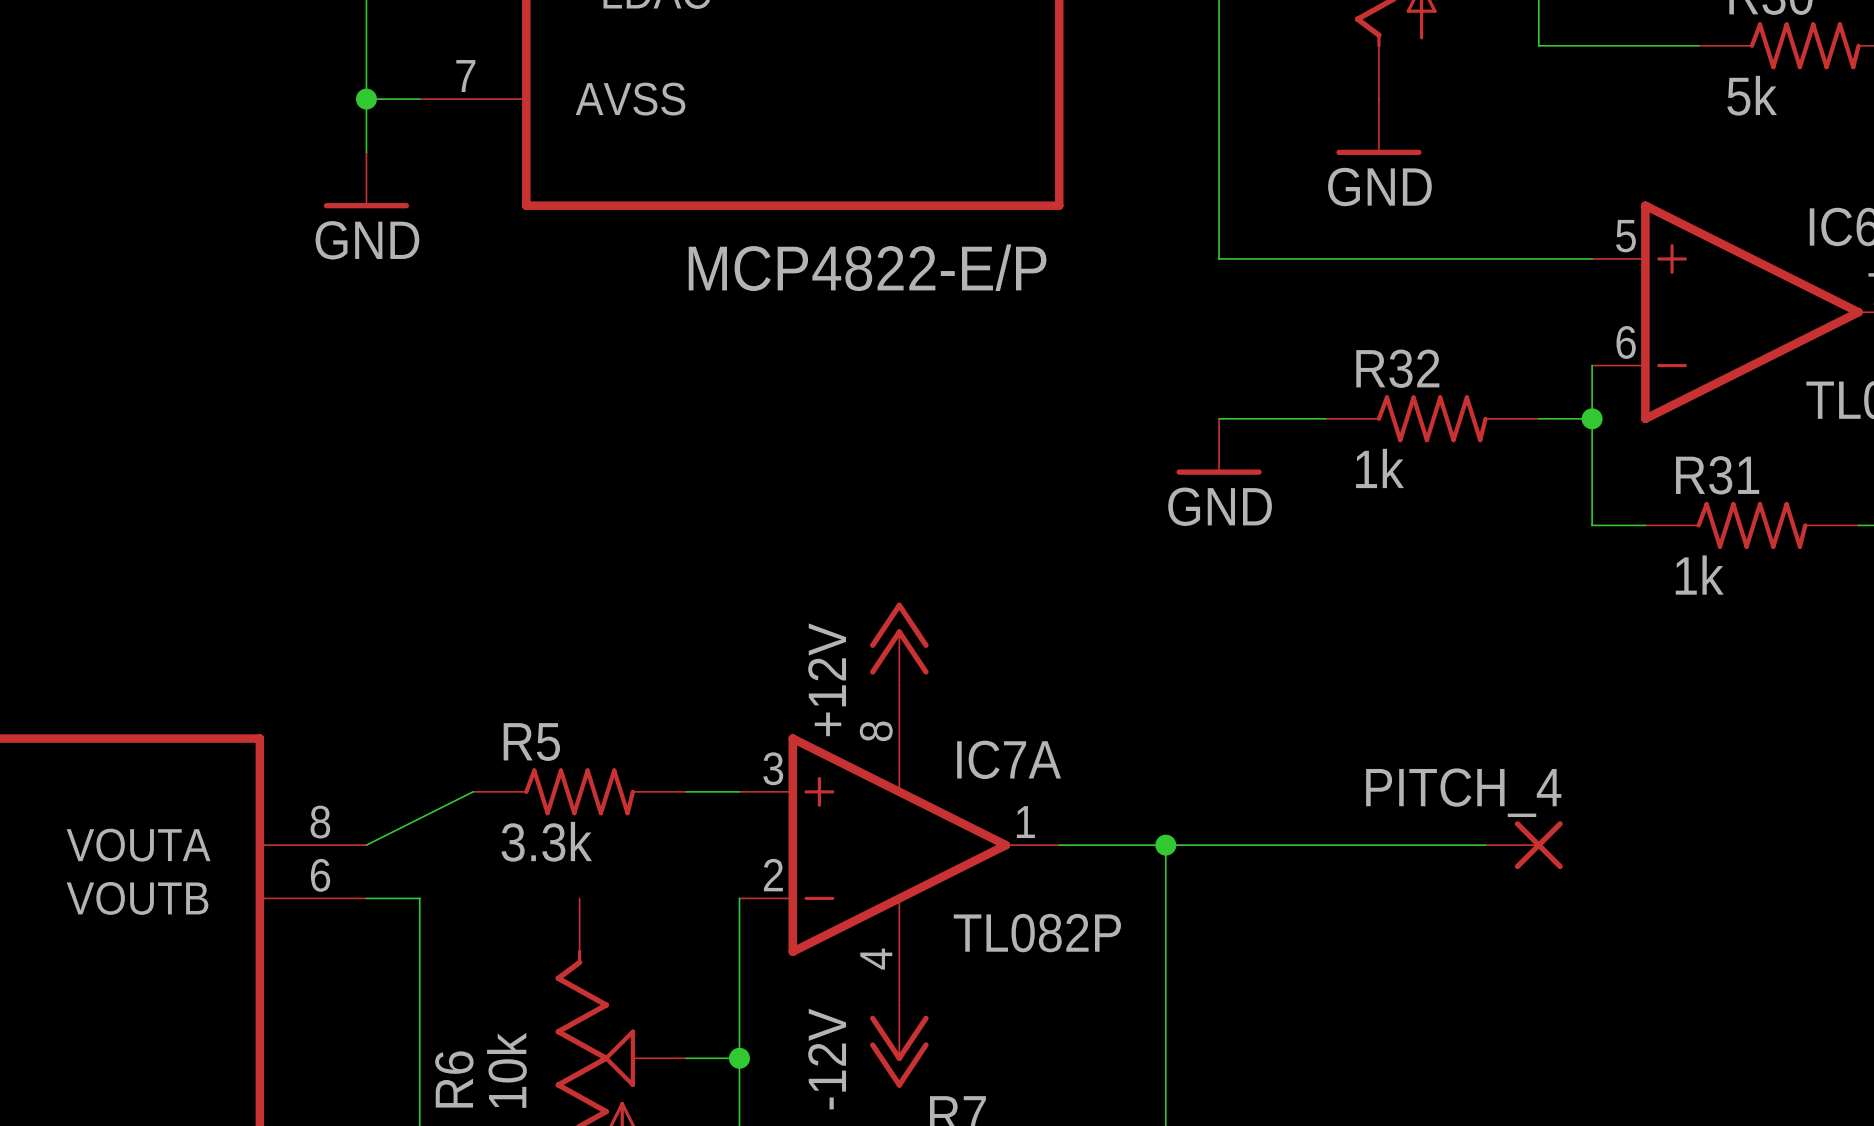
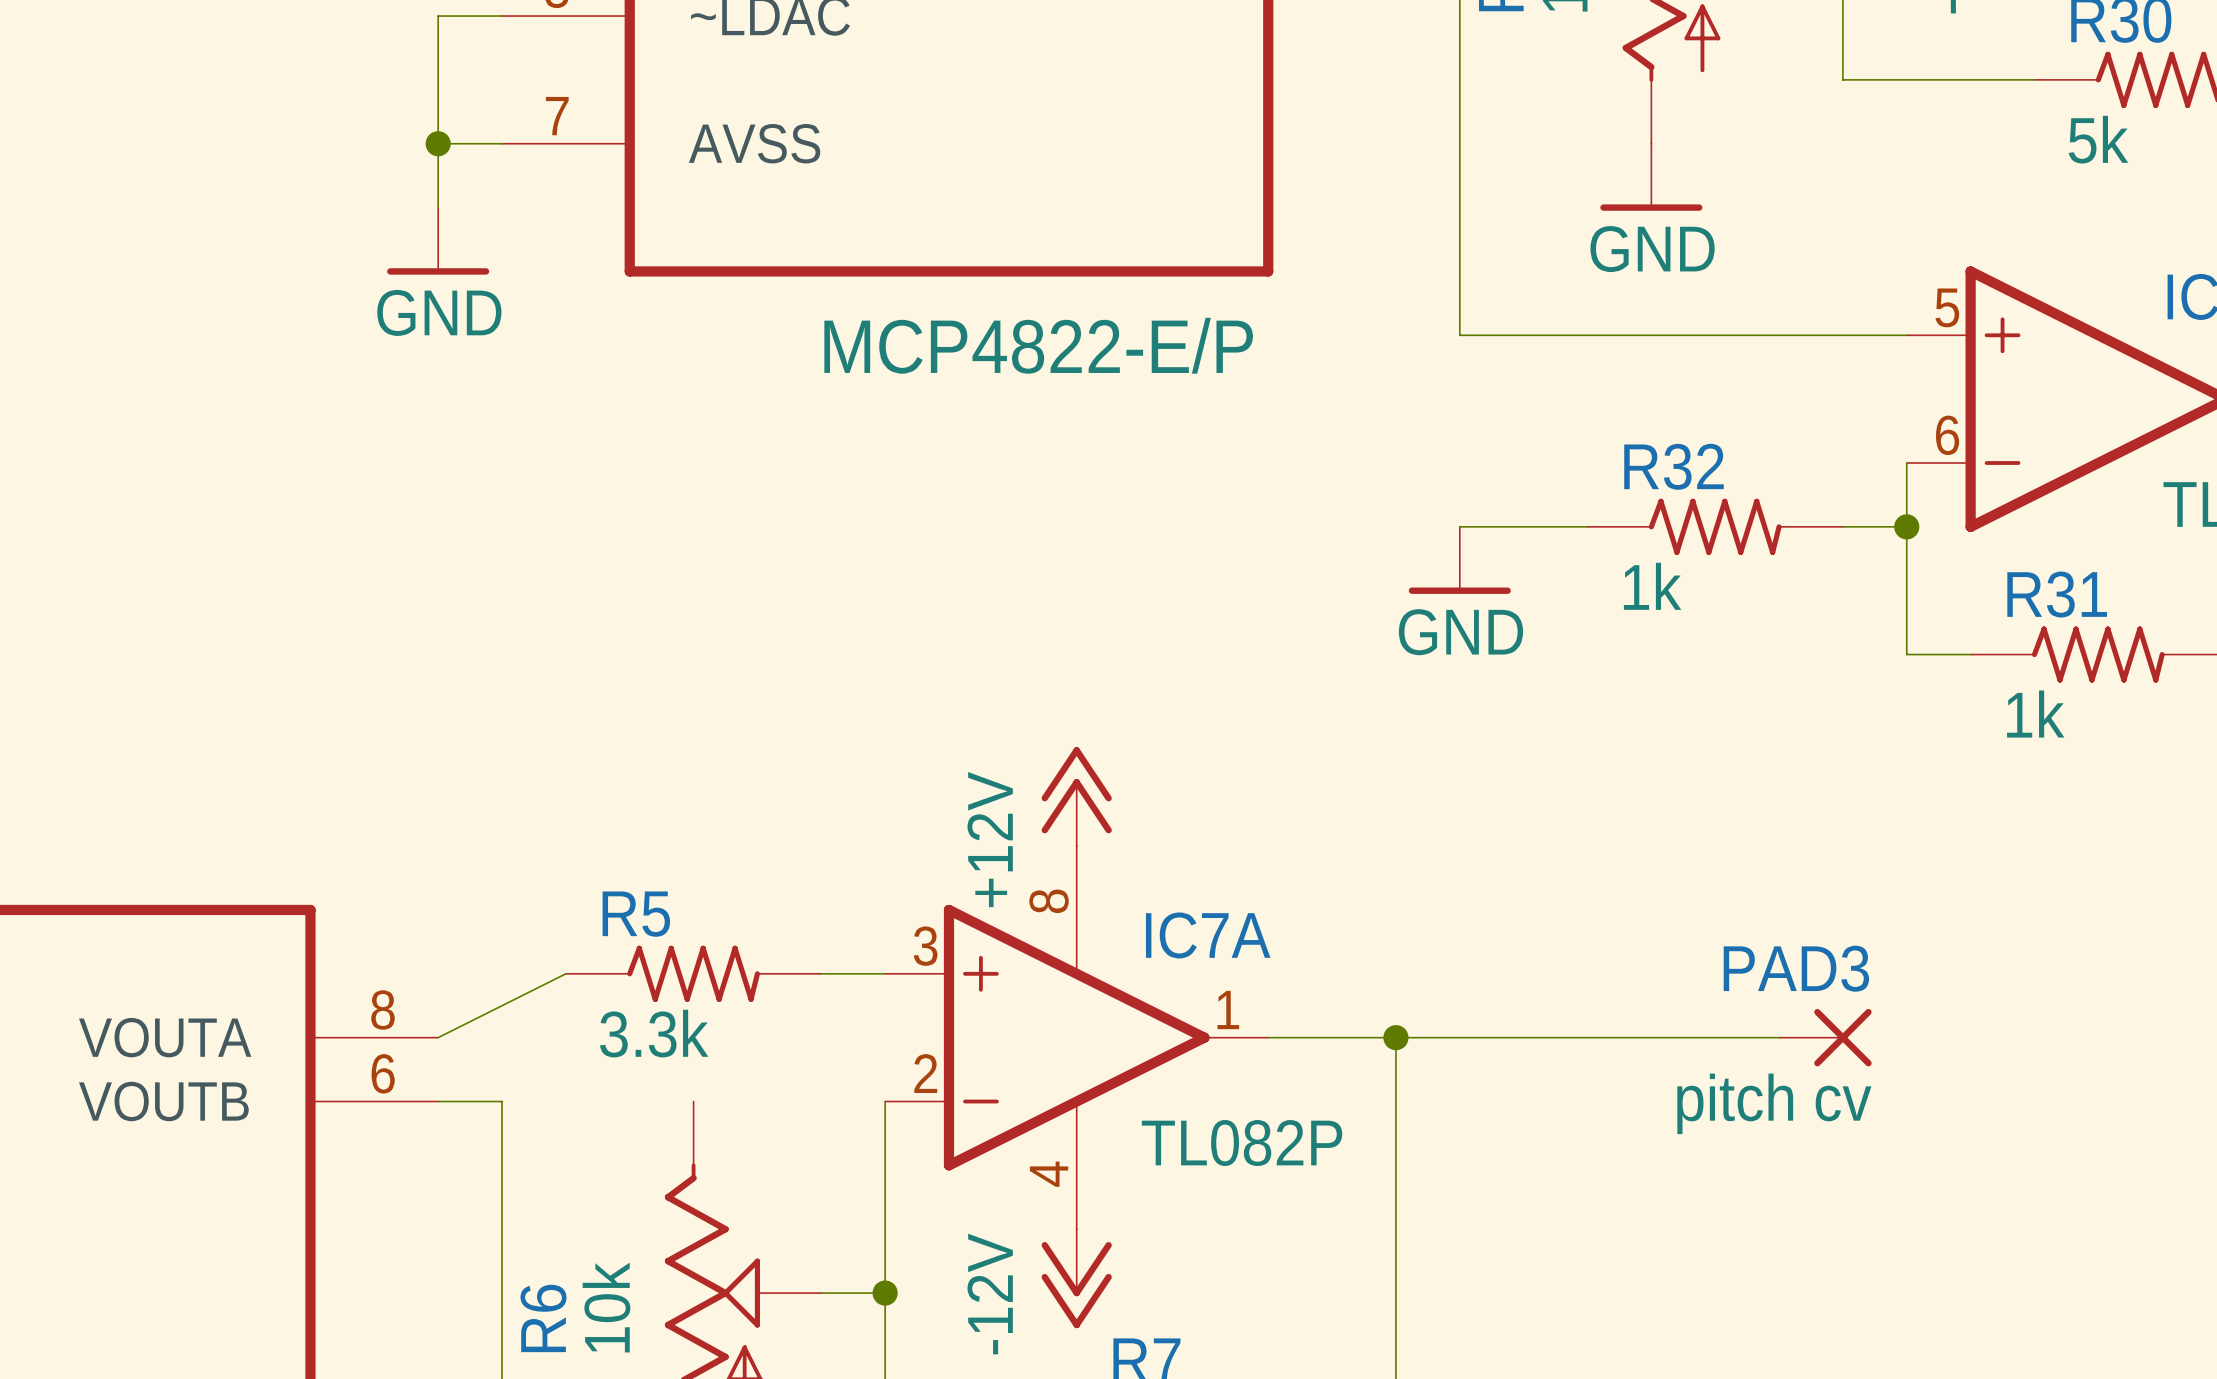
PITCH_4 name: PITCH_4 (1463, 792) -> PAD3 (1796, 968)
PITCH_4 value: none -> pitch cv (1774, 1103)

